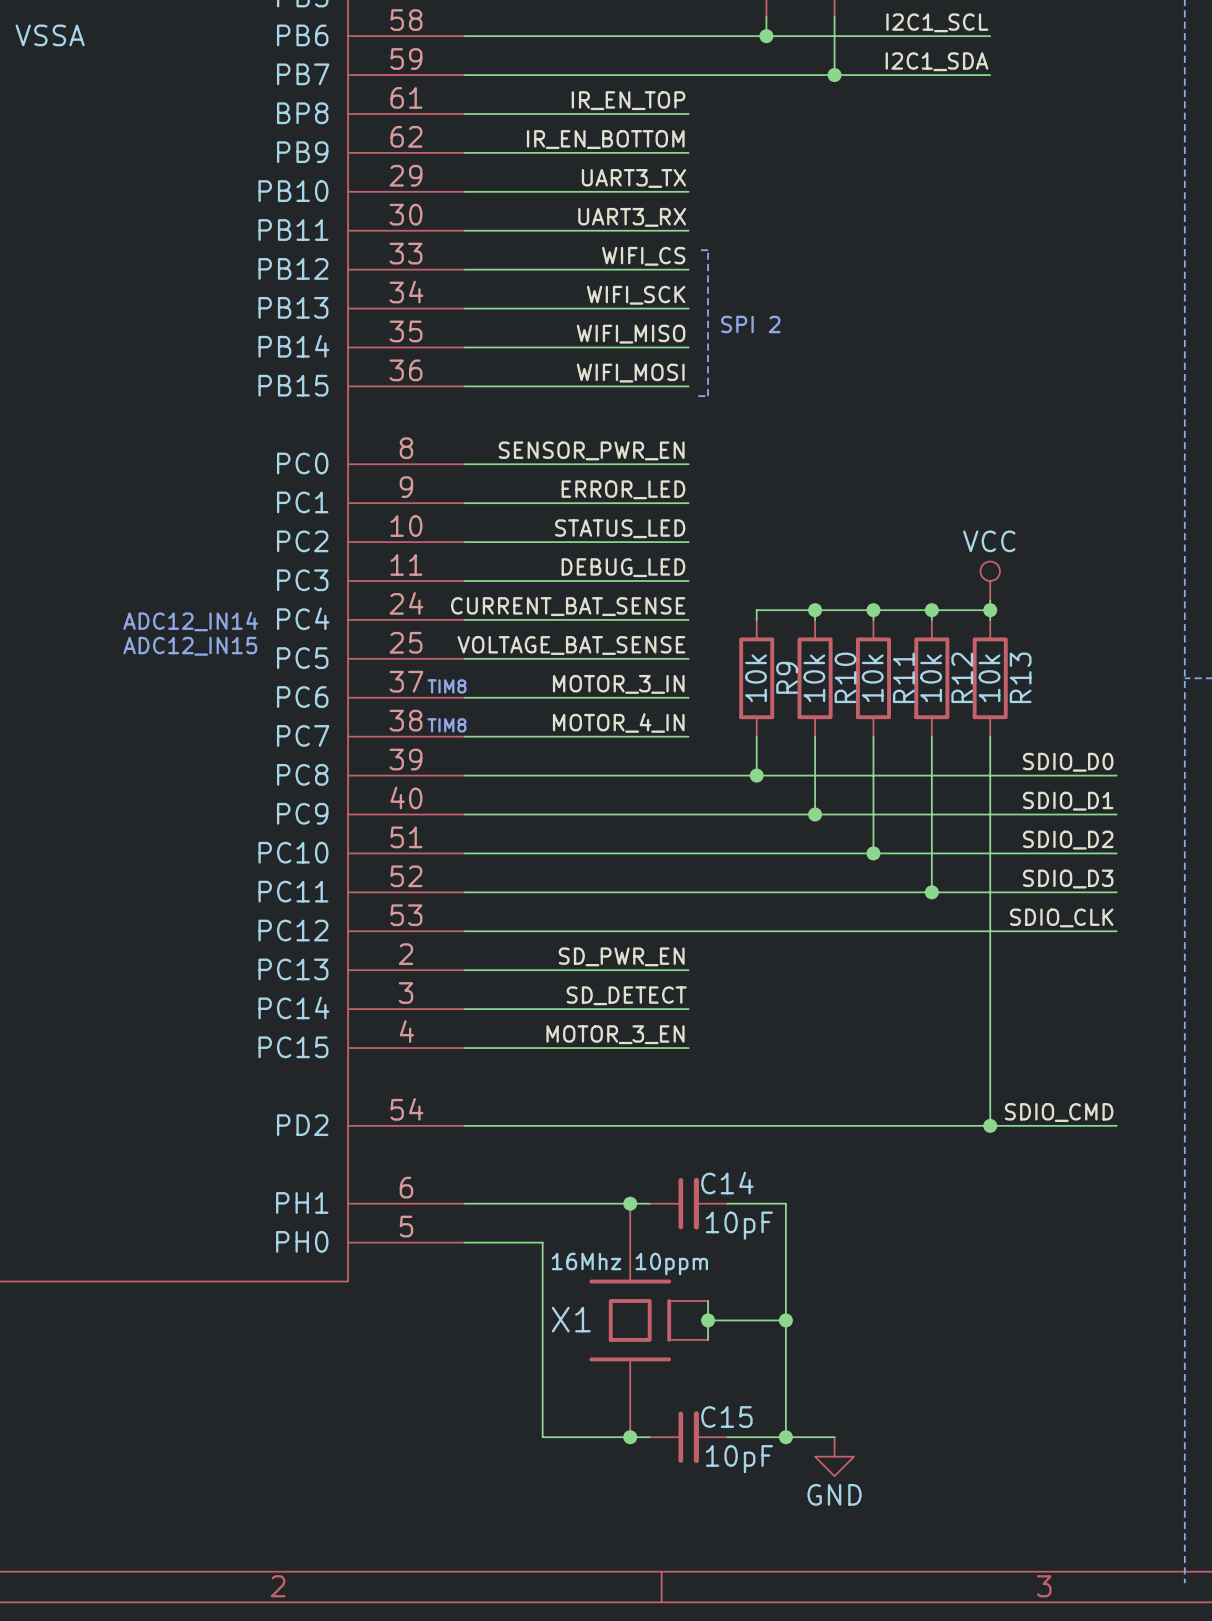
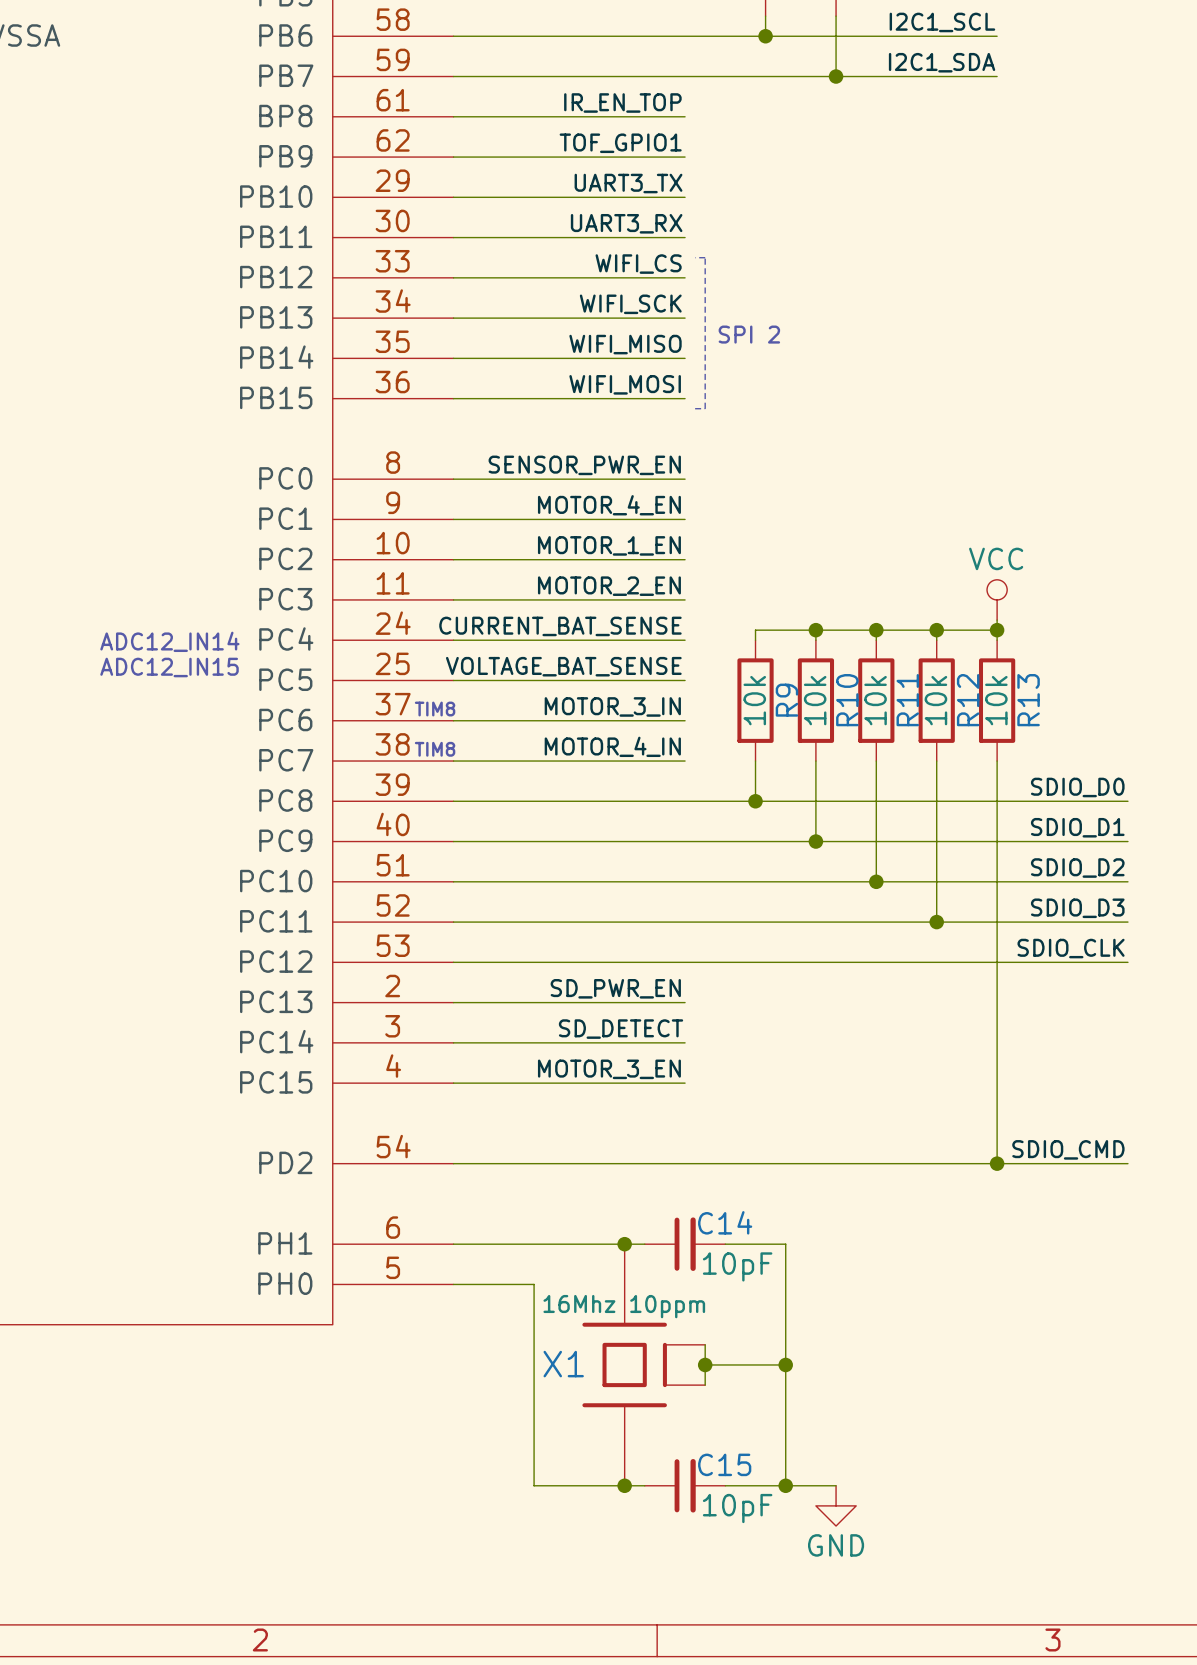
label: IR_EN_BOTTOM (605, 139) -> TOF_GPIO1 (620, 143)
label: ERROR_LED (623, 489) -> MOTOR_4_EN (609, 505)
label: STATUS_LED (620, 528) -> MOTOR_1_EN (609, 545)
label: DEBUG_LED (623, 567) -> MOTOR_2_EN (609, 586)

